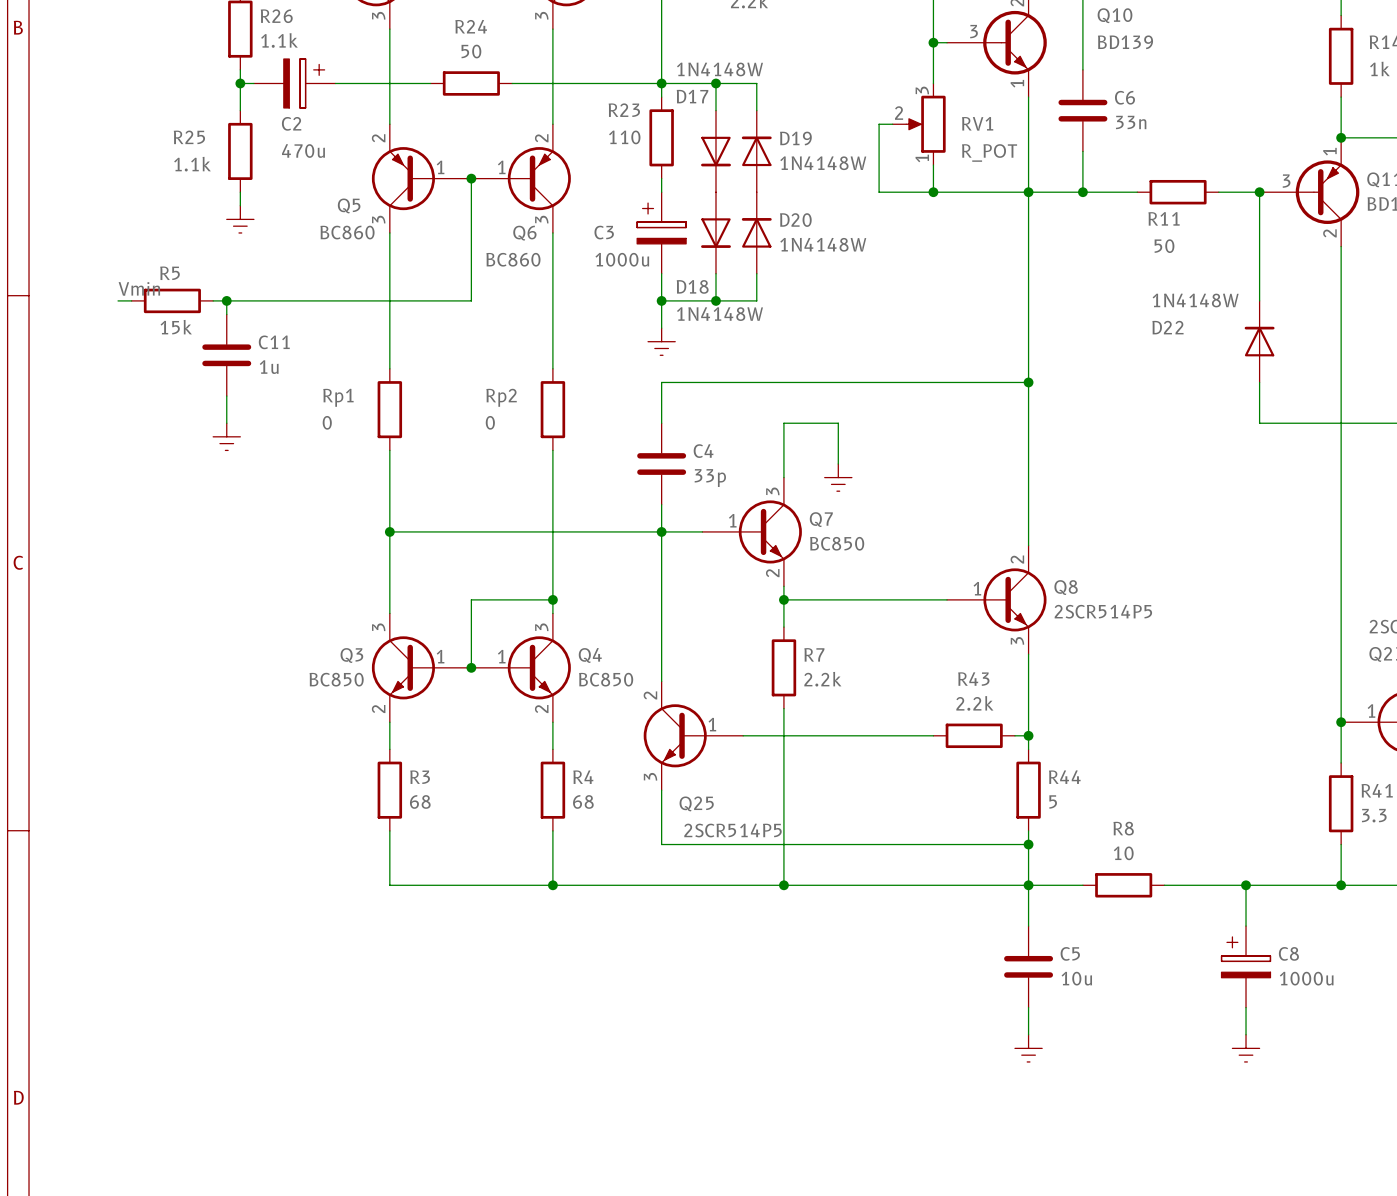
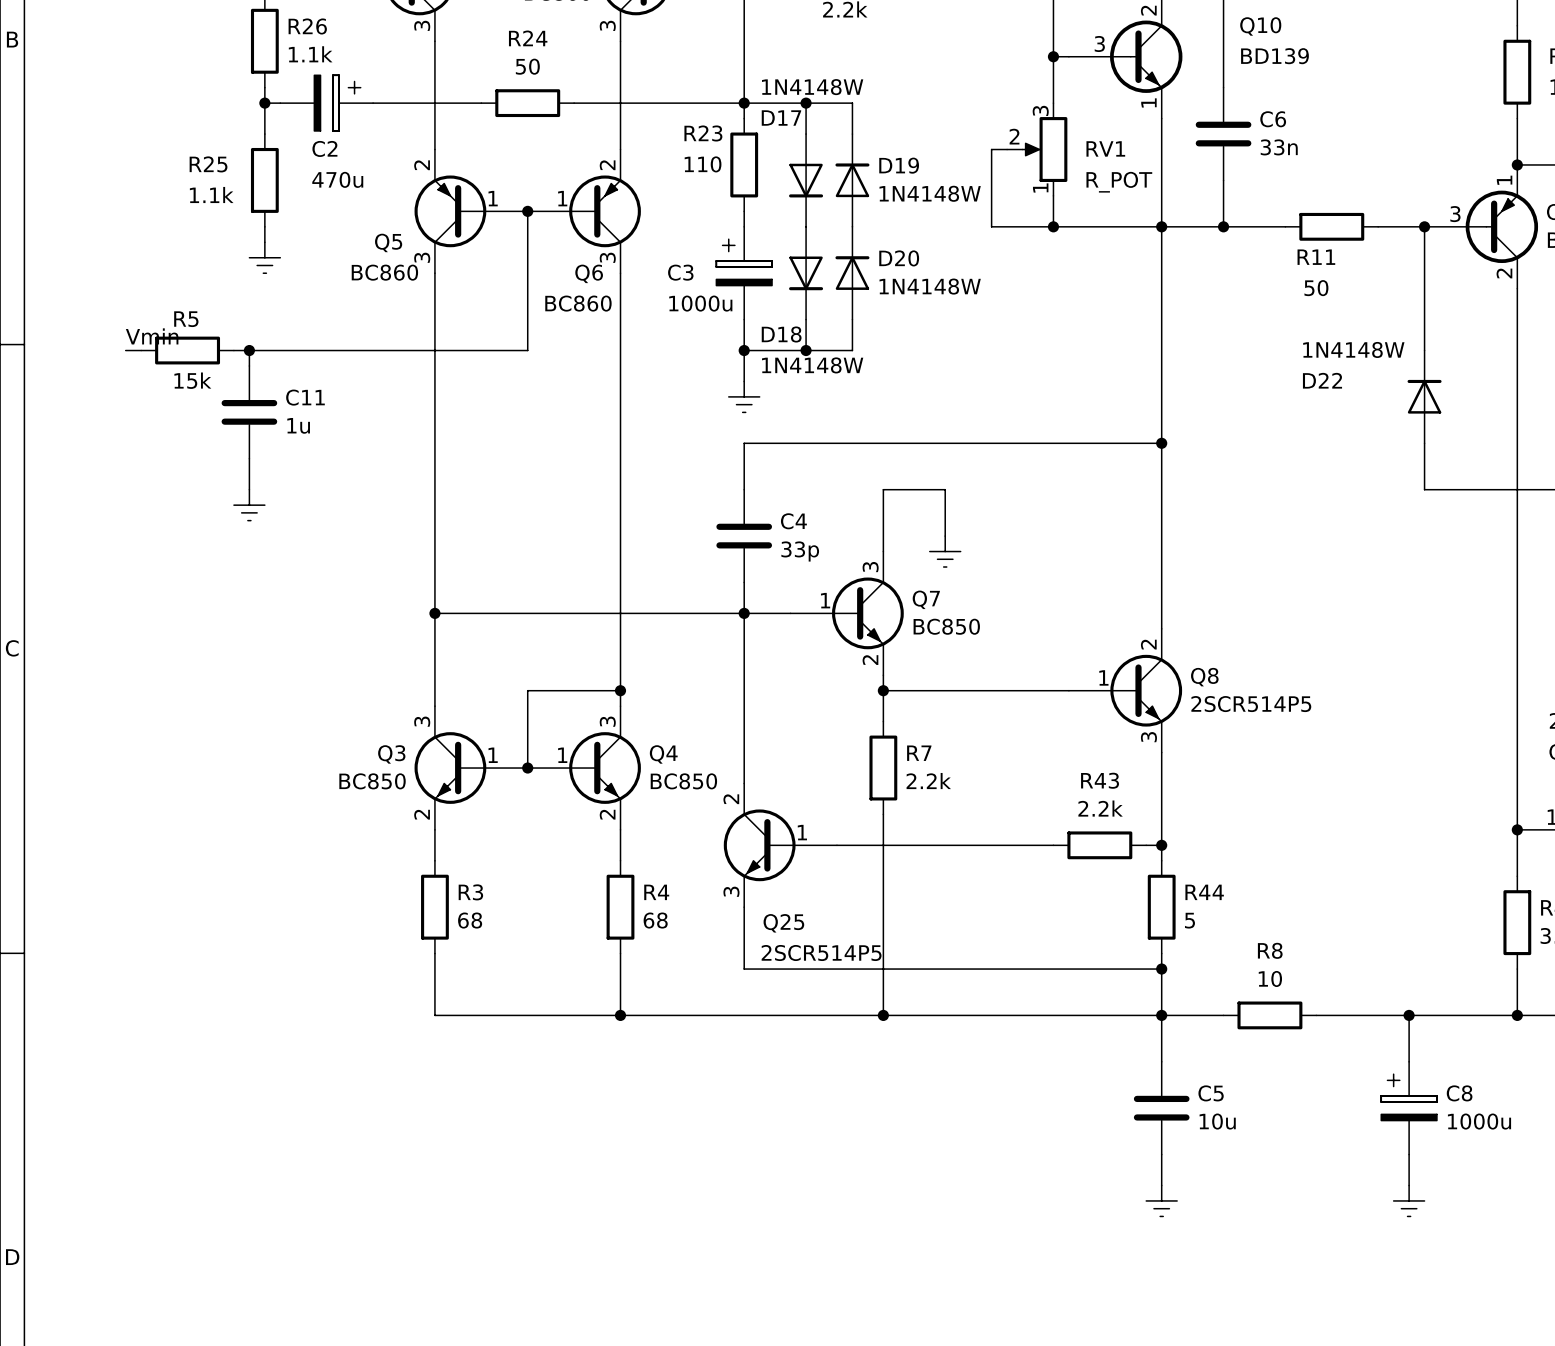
wire: none -> (434, 427) (434, 520)
wire: none -> (620, 427) (620, 520)
Rp1: 0 (389, 409) -> none
Rp2: 0 (552, 409) -> none

